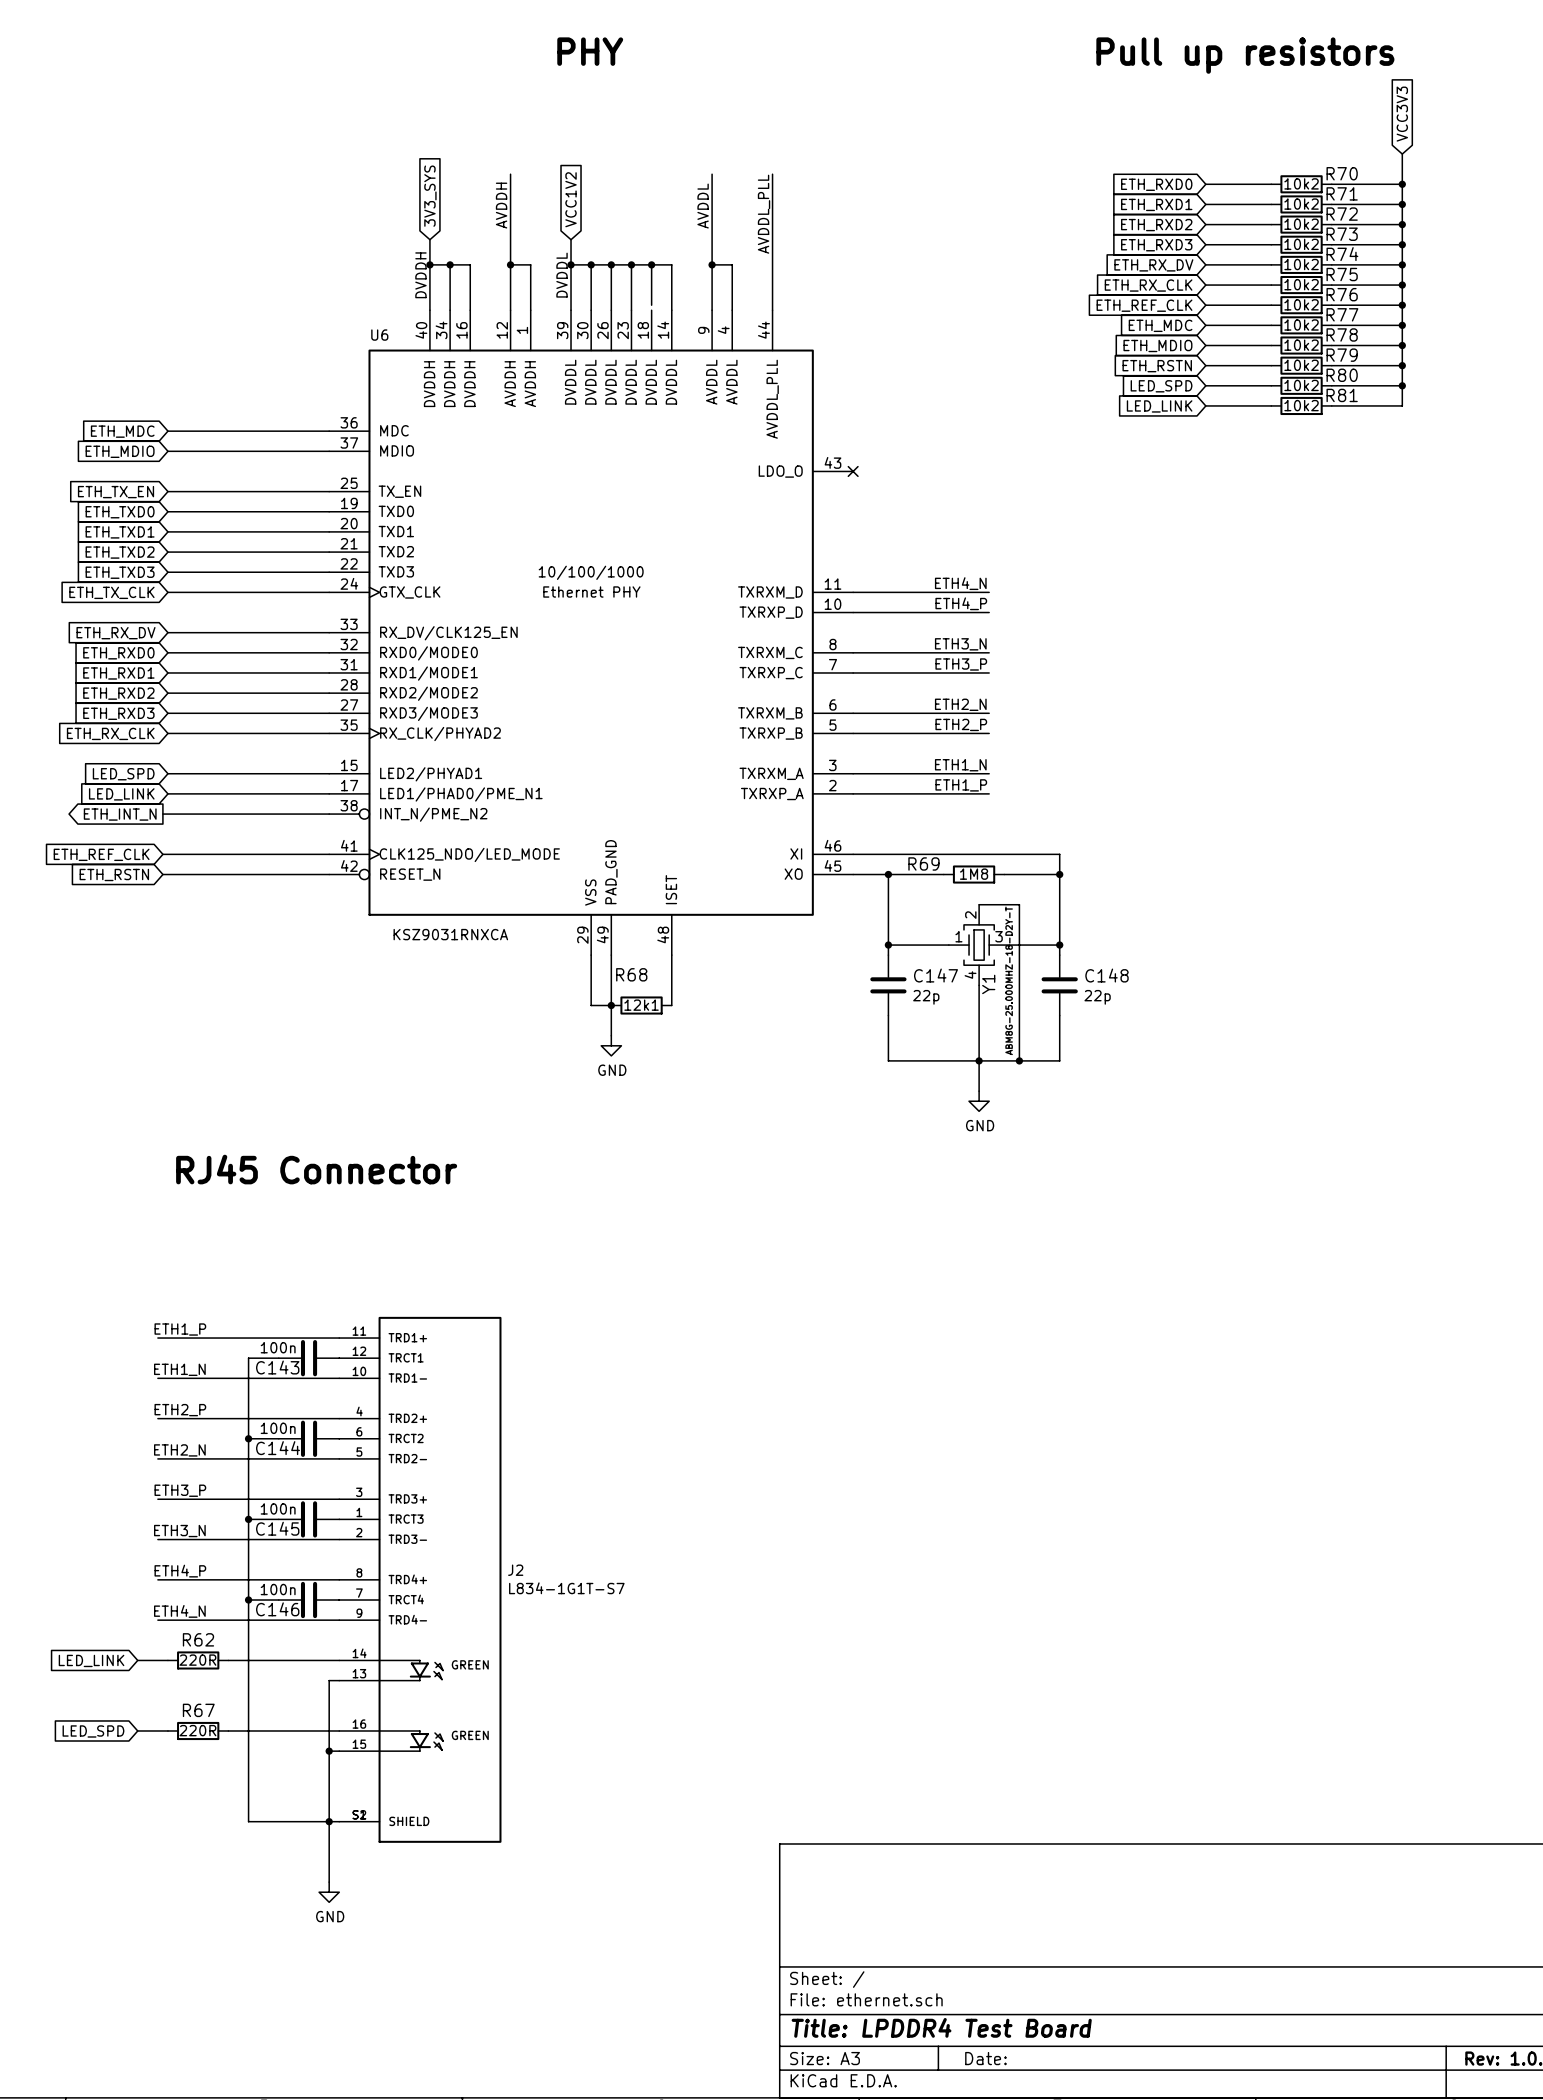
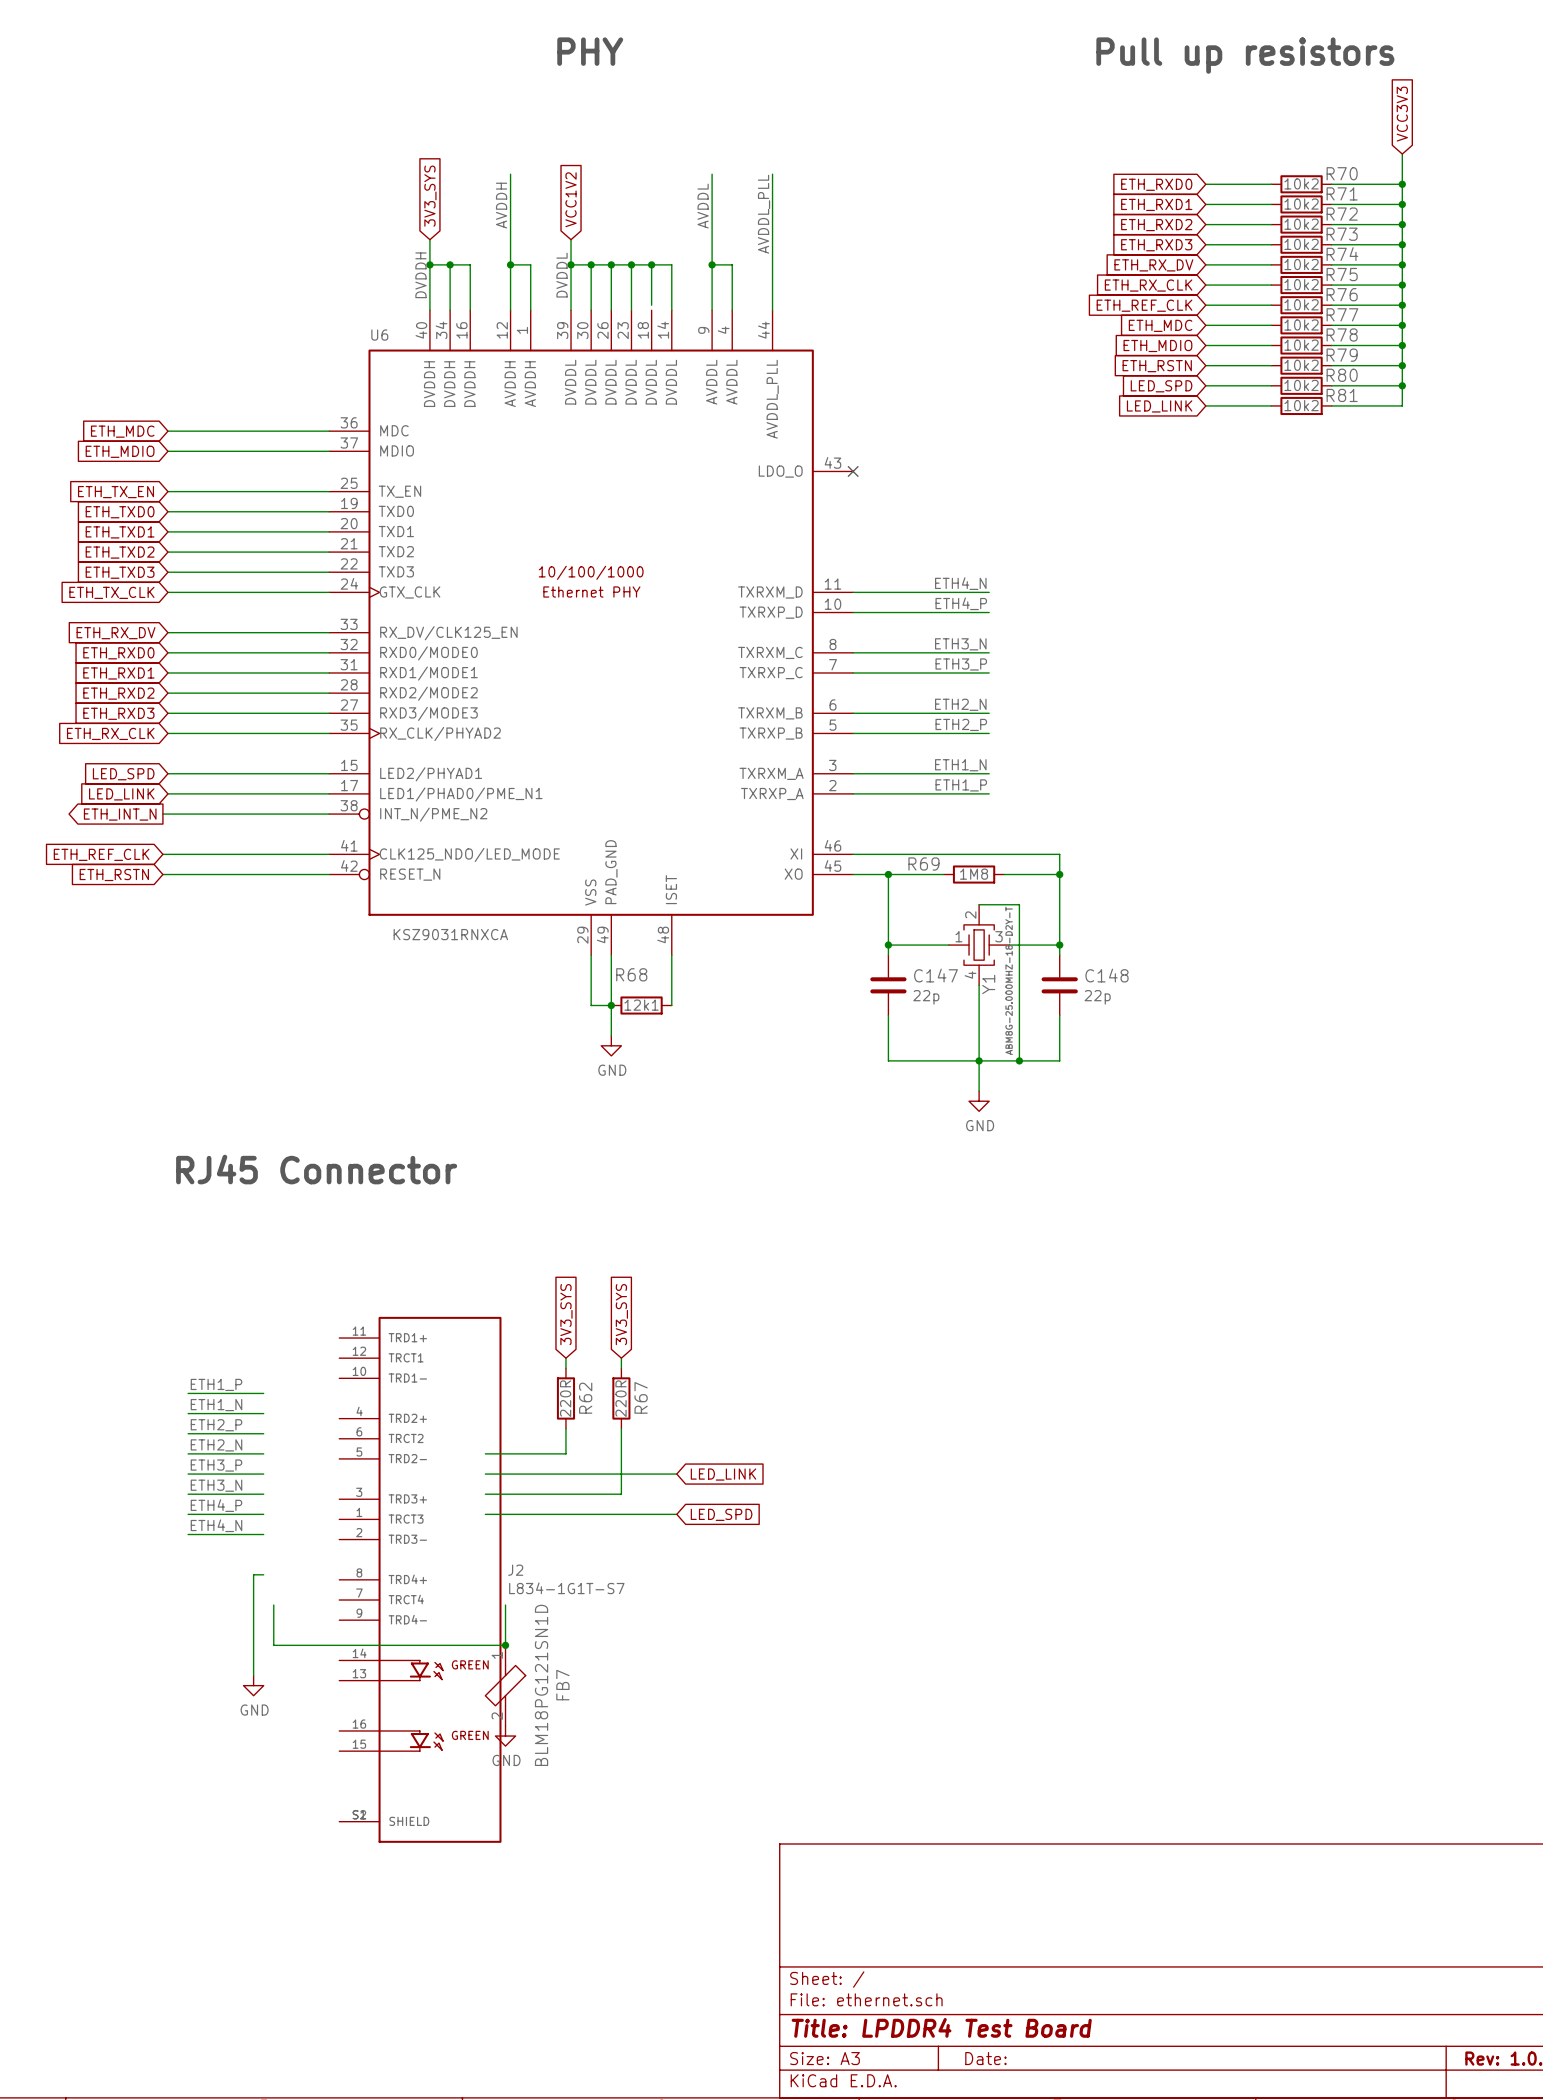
global label: none -> 3V3_SYS (566, 1314)
global label: none -> 3V3_SYS (621, 1314)
label position: ETH1_P (180, 1329) -> ETH1_P (216, 1384)
wire: (157, 1338) (339, 1338) -> none
wire: (278, 1358) (248, 1358) (248, 1821) (339, 1821) -> none
C143: (309, 1358) -> none
wire: none -> (565, 1358) (565, 1368)
wire: none -> (621, 1358) (621, 1368)
label position: ETH1_N (179, 1369) -> ETH1_N (216, 1405)
wire: (157, 1378) (339, 1378) -> none
wire: none -> (188, 1393) (263, 1393)
label position: ETH2_P (180, 1410) -> ETH2_P (216, 1425)
wire: none -> (188, 1413) (263, 1413)
wire: (157, 1418) (339, 1418) -> none
wire: none -> (565, 1428) (565, 1453) (485, 1453)
wire: none -> (621, 1428) (621, 1494) (485, 1494)
wire: none -> (188, 1433) (263, 1433)
wire: (248, 1438) (278, 1438) -> none
junction: (248, 1438) -> none
C144: (309, 1438) -> none
label position: ETH2_N (179, 1450) -> ETH2_N (216, 1445)
wire: none -> (188, 1453) (263, 1453)
wire: (157, 1458) (339, 1458) -> none
wire: none -> (188, 1474) (263, 1474)
wire: none -> (485, 1474) (676, 1474)
global label: none -> LED_LINK (723, 1474)
label position: ETH3_P (180, 1490) -> ETH3_P (216, 1465)
wire: none -> (188, 1494) (263, 1494)
wire: (157, 1499) (339, 1499) -> none
wire: none -> (188, 1514) (263, 1514)
wire: none -> (485, 1514) (676, 1514)
global label: none -> LED_SPD (721, 1514)
wire: (248, 1519) (278, 1519) -> none
junction: (248, 1519) -> none
C145: (309, 1519) -> none
label position: ETH3_N (179, 1531) -> ETH3_N (216, 1485)
wire: none -> (188, 1534) (263, 1534)
wire: (157, 1539) (339, 1539) -> none
label position: ETH4_P (180, 1571) -> ETH4_P (216, 1505)
wire: none -> (263, 1574) (253, 1574) (253, 1675)
wire: (157, 1579) (339, 1579) -> none
wire: (248, 1600) (278, 1600) -> none
junction: (248, 1600) -> none
C146: (309, 1600) -> none
wire: none -> (273, 1605) (273, 1645) (505, 1645) (505, 1605)
label position: ETH4_N (179, 1611) -> ETH4_N (216, 1525)
wire: (157, 1620) (339, 1620) -> none
junction: none -> (505, 1645)
global label: LED_LINK (91, 1660) -> none
wire: (137, 1660) (167, 1660) -> none
R62 rotation: 0° (198, 1660) -> 90° clockwise (565, 1398)
R62 position: (198, 1660) -> (565, 1398)
wire: (228, 1660) (339, 1660) -> none
wire: (339, 1680) (329, 1680) (329, 1882) -> none
power symbol: none -> GND (253, 1685)
FB7: none -> BLM18PG121SN1D (505, 1685)
wire: (137, 1730) (167, 1730) -> none
R67 rotation: 0° (198, 1730) -> 90° clockwise (621, 1398)
R67 position: (198, 1730) -> (621, 1398)
wire: (228, 1730) (339, 1730) -> none
global label: LED_SPD (93, 1731) -> none
power symbol: none -> GND (505, 1736)
wire: (329, 1751) (339, 1751) -> none
junction: (329, 1751) -> none
junction: (329, 1821) -> none
power symbol: GND (329, 1892) -> none

